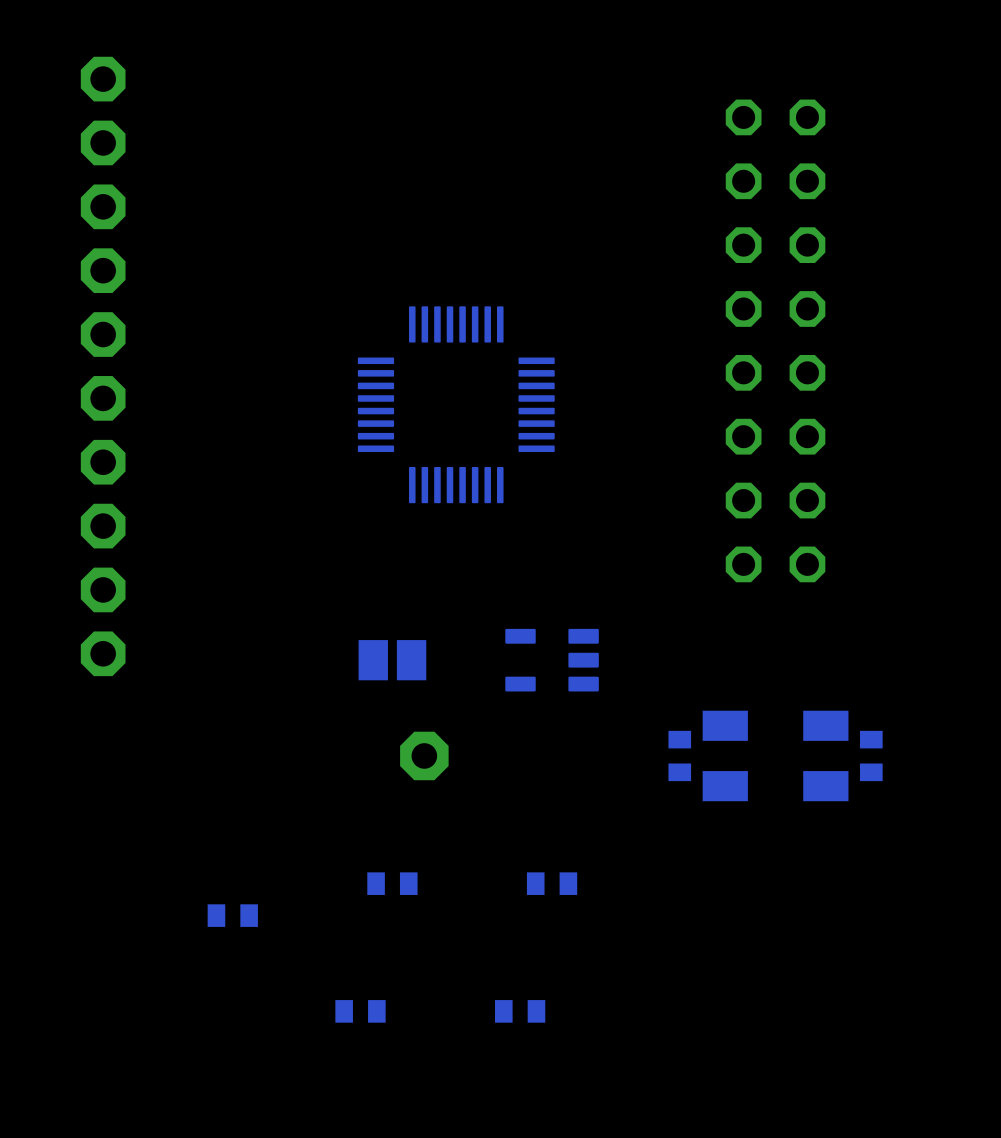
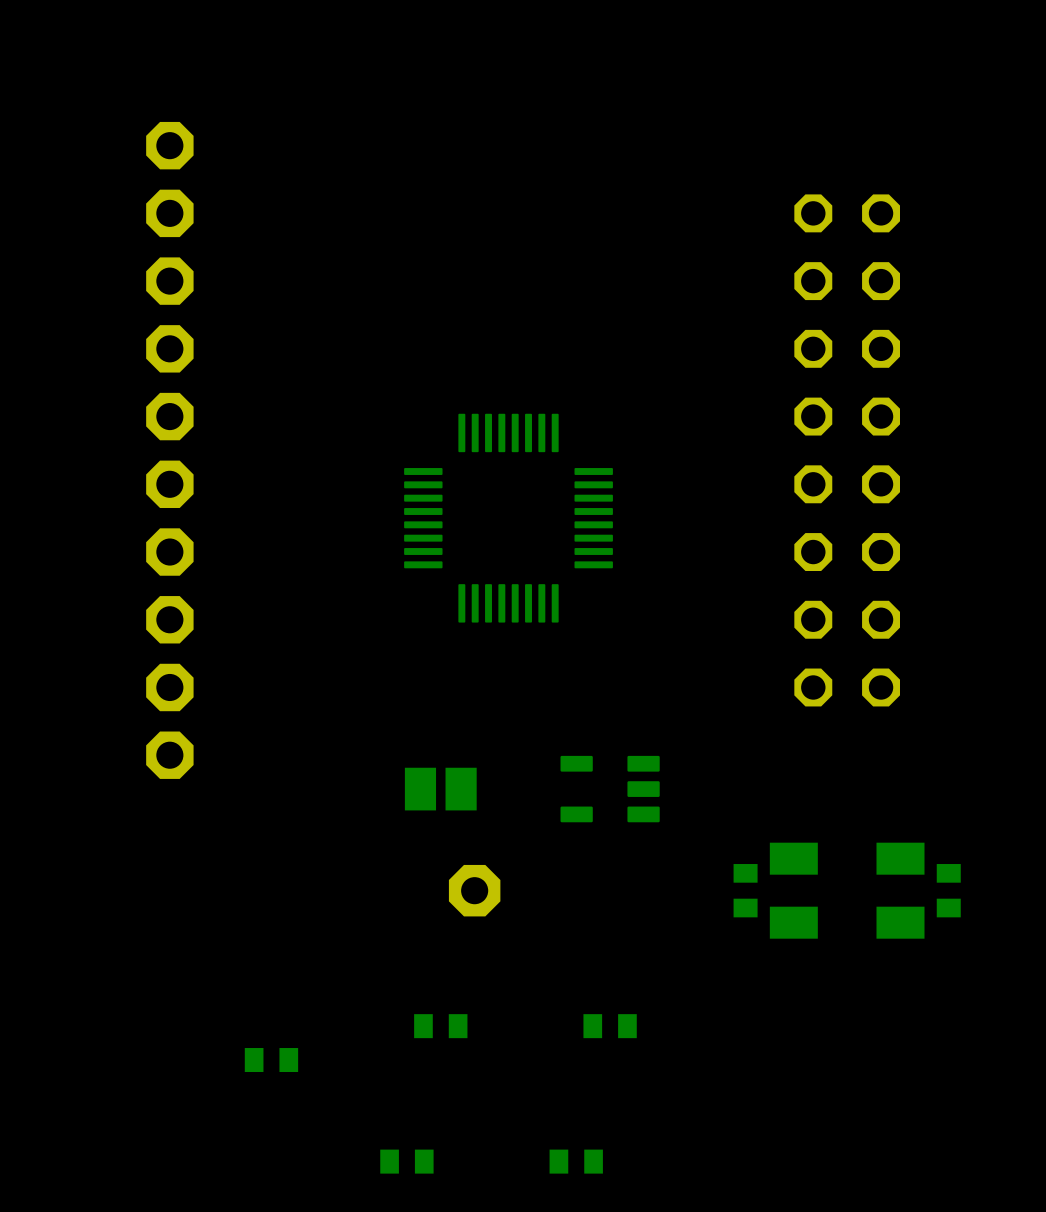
part position: (103, 366) -> (169, 450)

